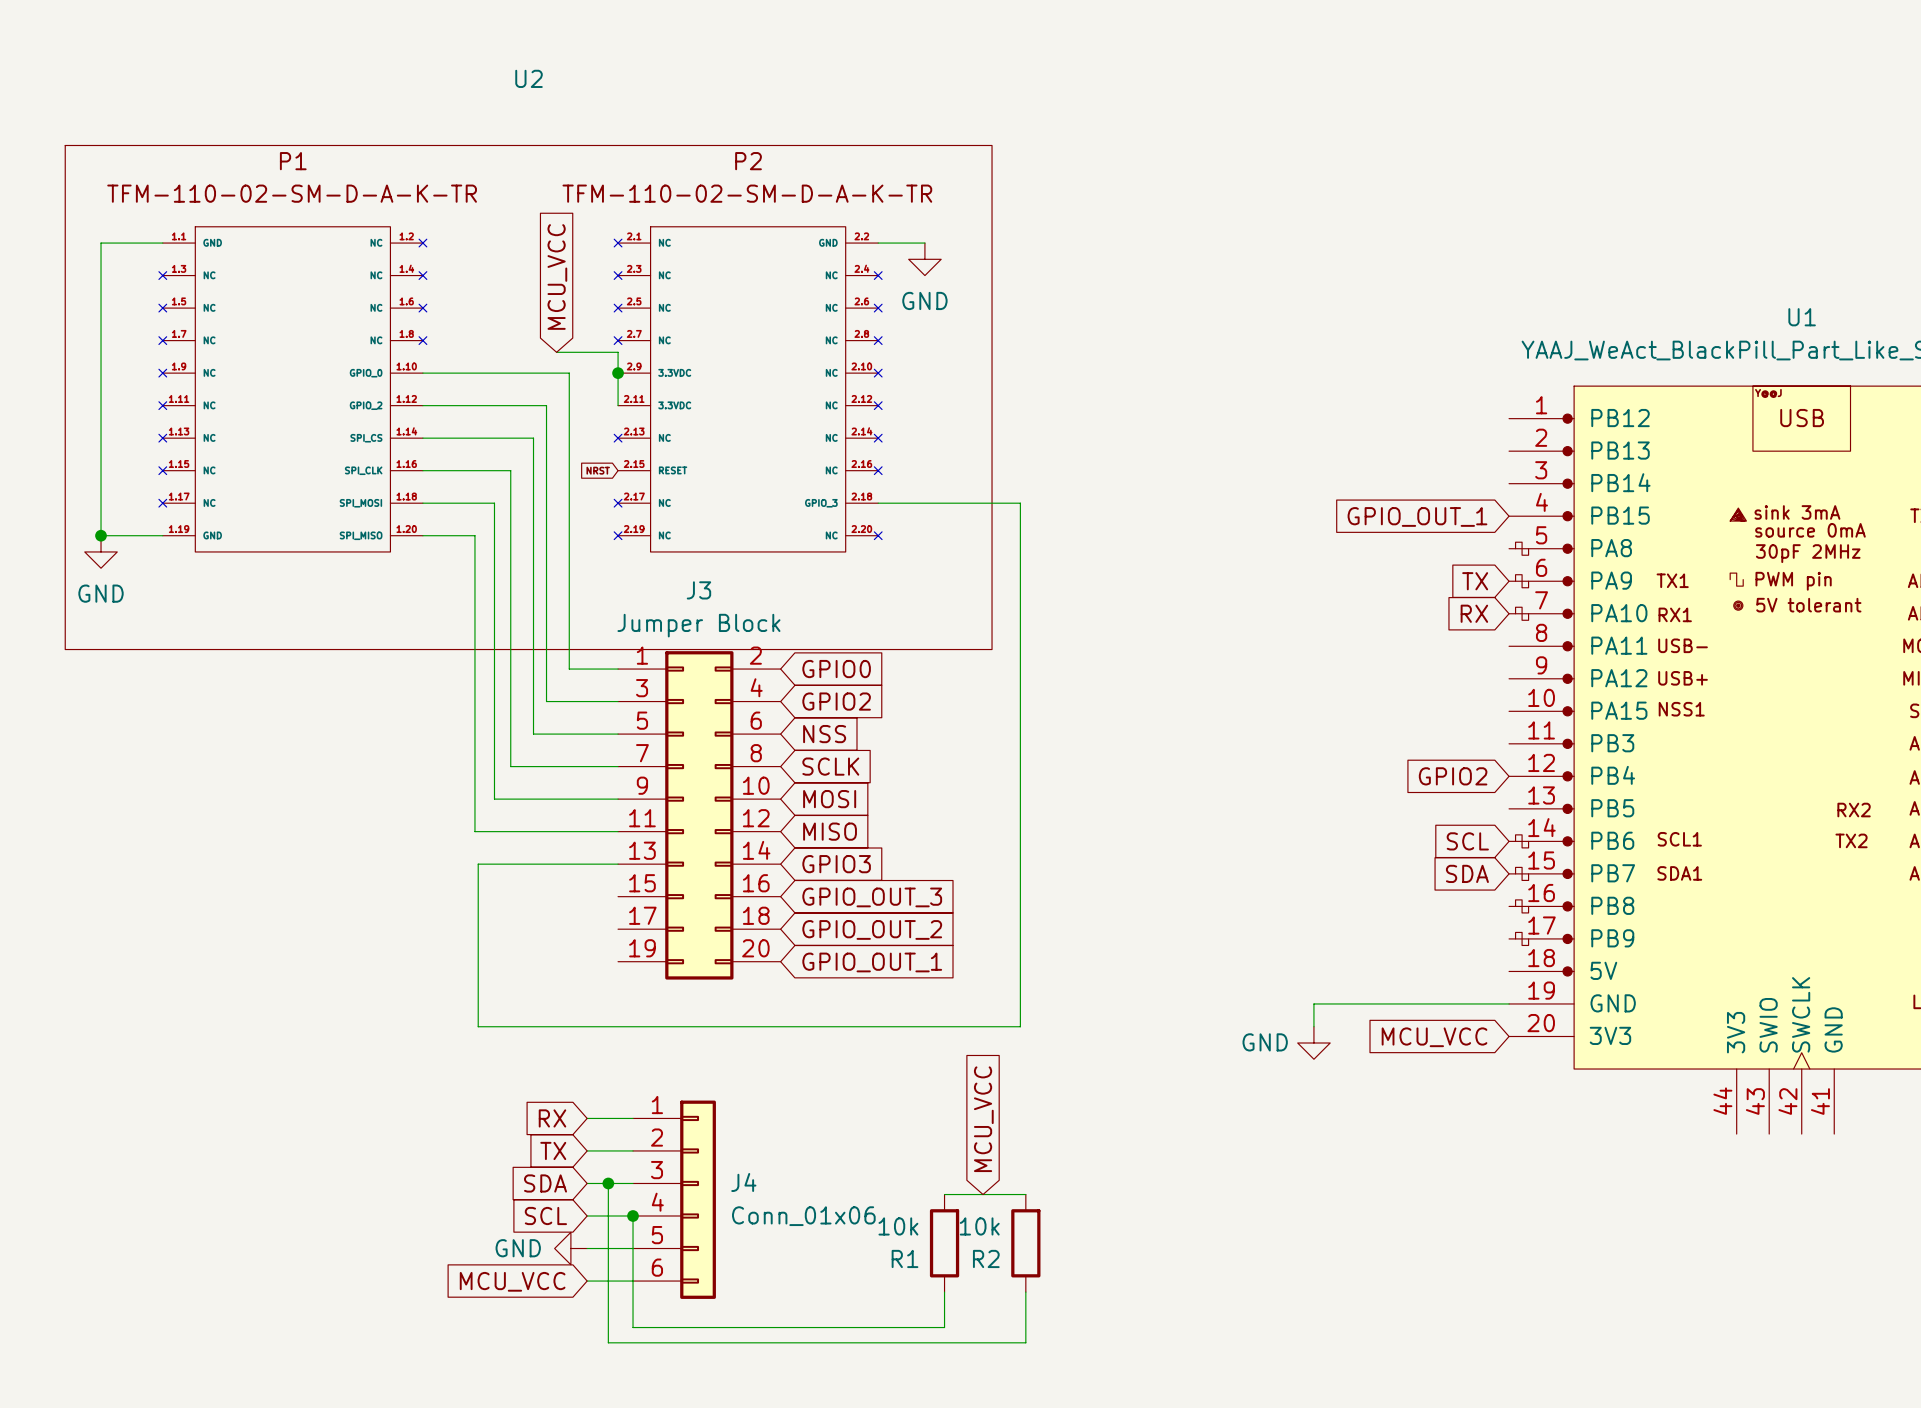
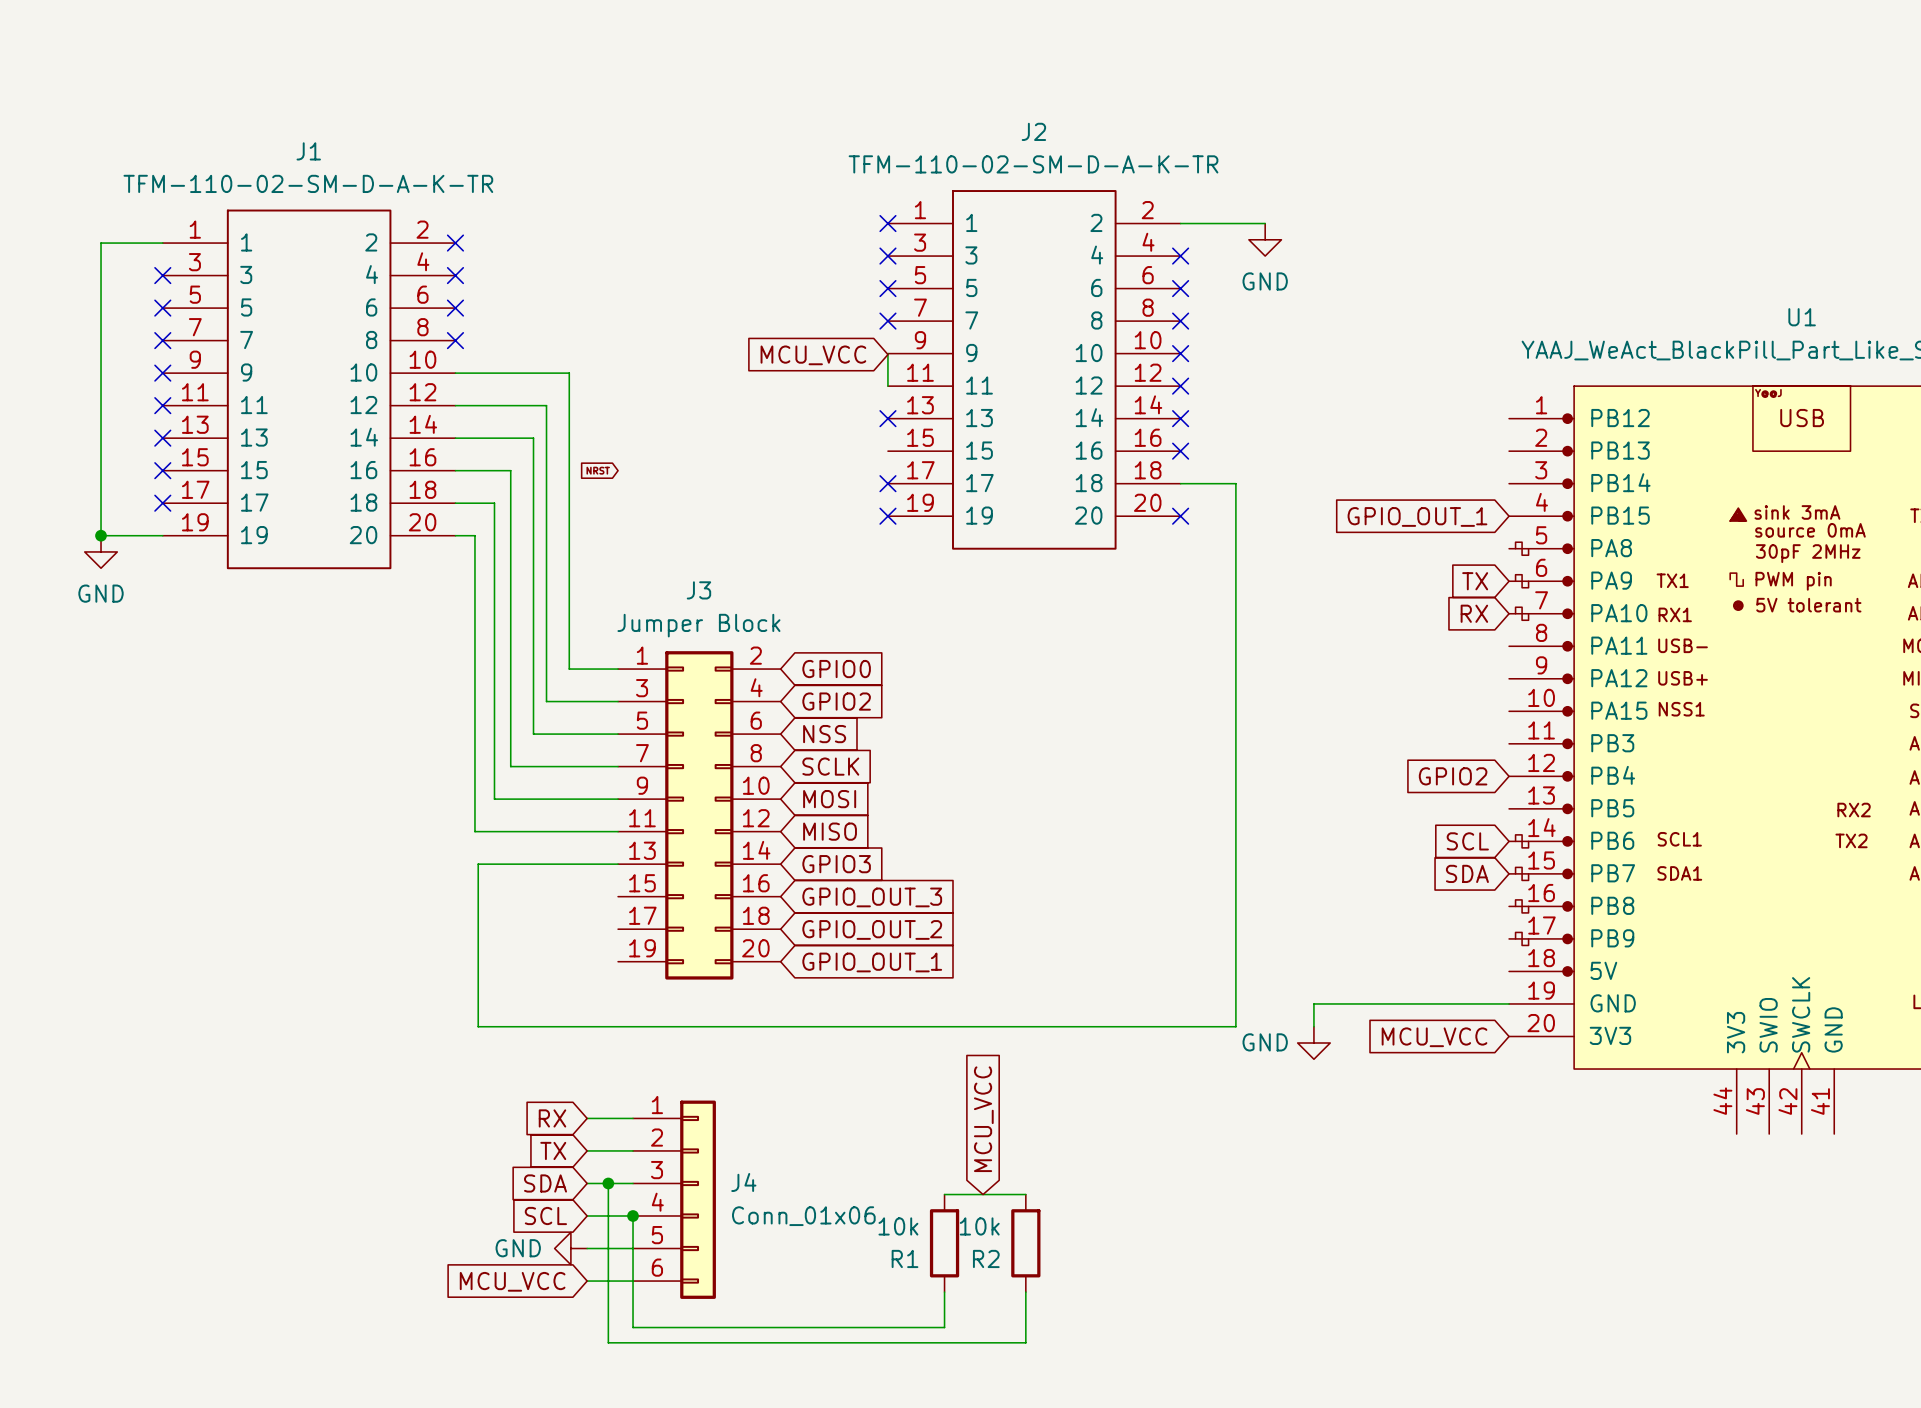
no-connect mark: none -> (887, 223)
wire: none -> (1180, 223) (1265, 223)
power symbol: none -> GND (1265, 239)
no-connect mark: none -> (455, 243)
wire: (878, 243) (924, 243) -> none
no-connect mark: none -> (887, 256)
no-connect mark: none -> (1180, 256)
power symbol: GND (924, 259) -> none
no-connect mark: none -> (162, 275)
no-connect mark: none -> (455, 275)
global label: MCU_VCC (557, 276) -> none
no-connect mark: none -> (887, 288)
no-connect mark: none -> (1180, 288)
no-connect mark: none -> (162, 308)
no-connect mark: none -> (455, 308)
no-connect mark: none -> (887, 321)
no-connect mark: none -> (1180, 321)
no-connect mark: none -> (162, 340)
no-connect mark: none -> (455, 340)
wire: (556, 352) (618, 352) (618, 405) -> none
wire: none -> (887, 353) (887, 386)
no-connect mark: none -> (1180, 353)
global label: none -> MCU_VCC (813, 355)
J2: none -> TFM-110-02-SM-D-A-K-TR (1034, 369)
no-connect mark: none -> (162, 373)
junction: (618, 373) -> none
no-connect mark: none -> (1180, 386)
J1: none -> TFM-110-02-SM-D-A-K-TR (309, 389)
U2: (528, 397) -> none
no-connect mark: none -> (162, 405)
no-connect mark: none -> (887, 418)
no-connect mark: none -> (1180, 418)
no-connect mark: none -> (162, 438)
no-connect mark: none -> (1180, 451)
no-connect mark: none -> (162, 470)
no-connect mark: none -> (887, 483)
no-connect mark: none -> (162, 503)
wire: (878, 503) (1020, 503) (1020, 1026) -> (1180, 483) (1235, 483) (1235, 1026) (1020, 1026)
no-connect mark: none -> (887, 516)
no-connect mark: none -> (1180, 516)

